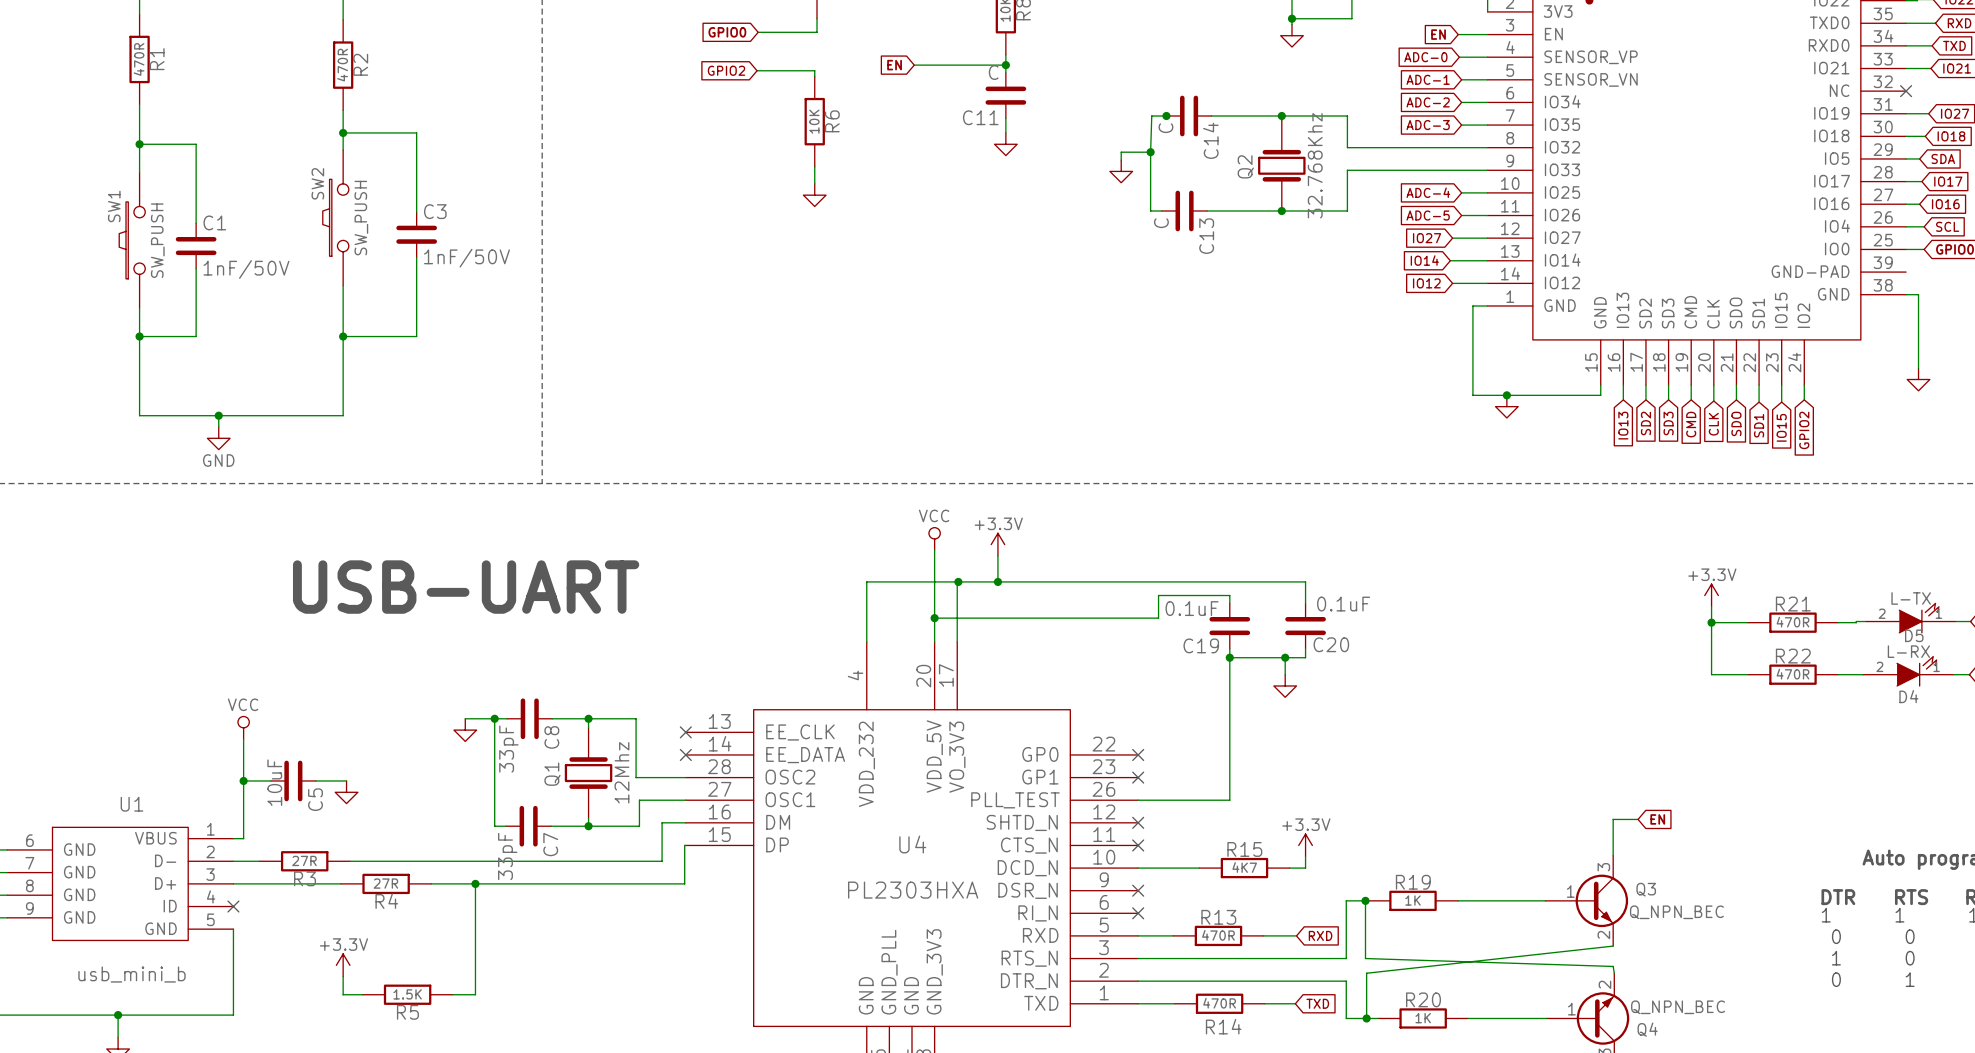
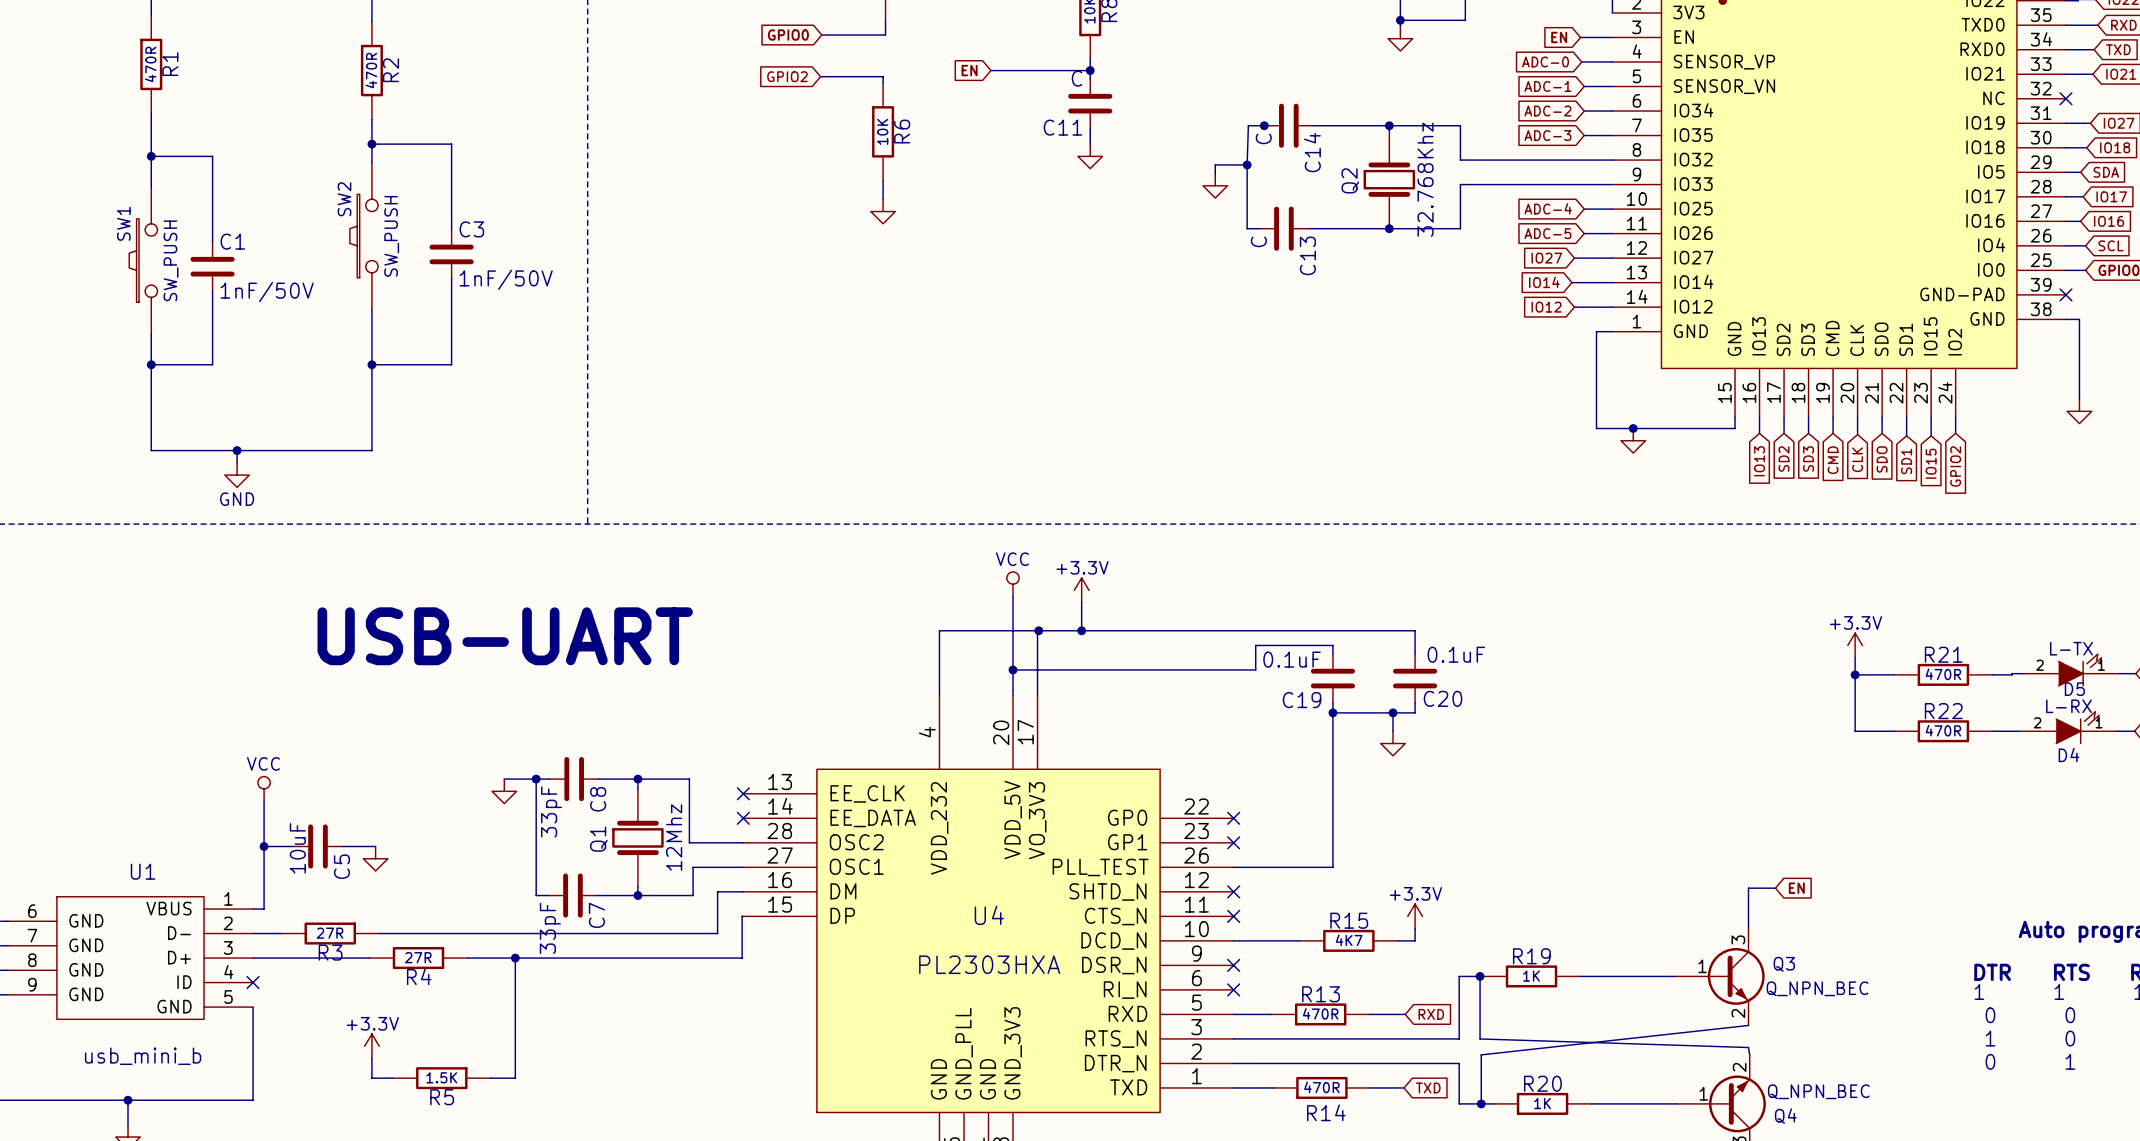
no-connect mark: none -> (2065, 294)

